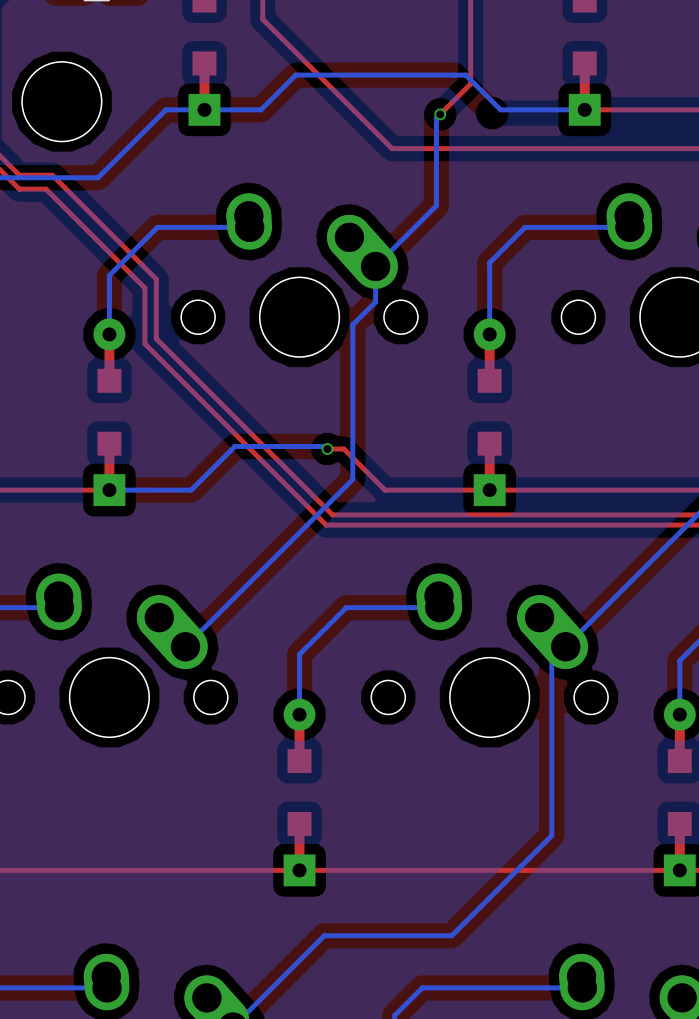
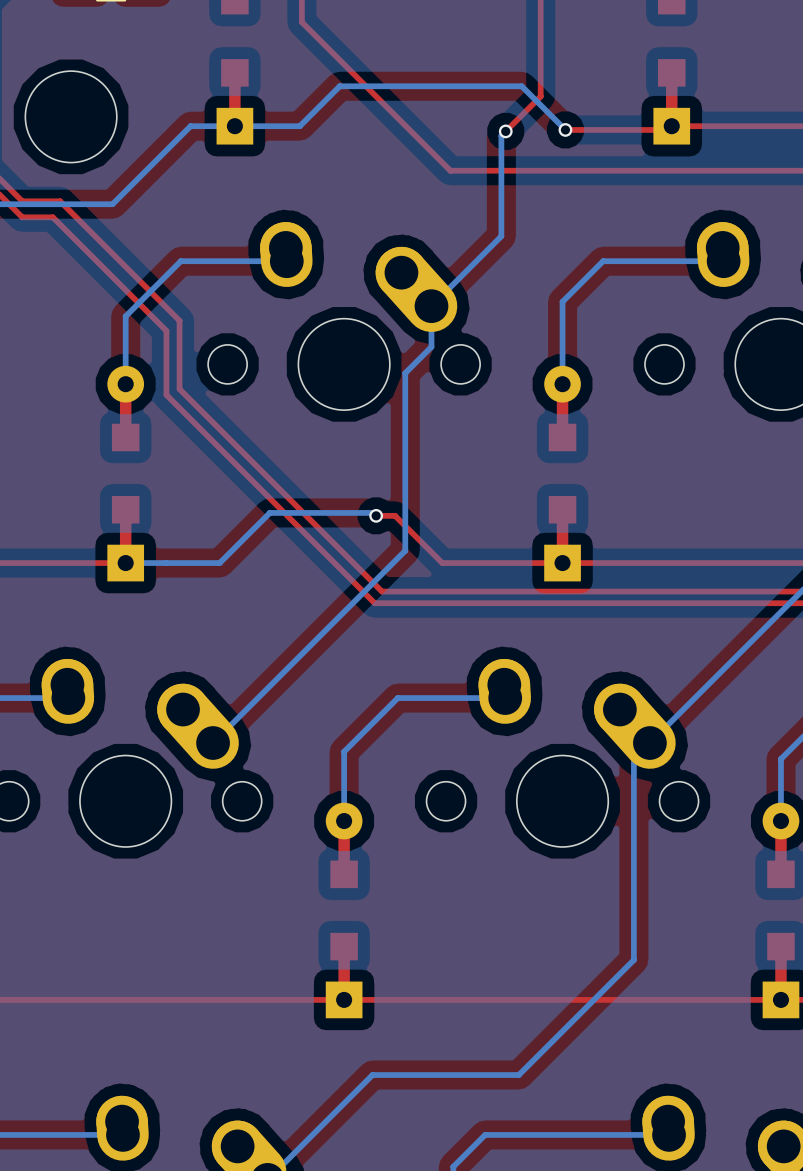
bottom track: (454, 75) (465, 75) (500, 109) (584, 109) -> (521, 86) (565, 129)
via: none -> (565, 129)
top track: none -> (668, 129) (565, 129)

